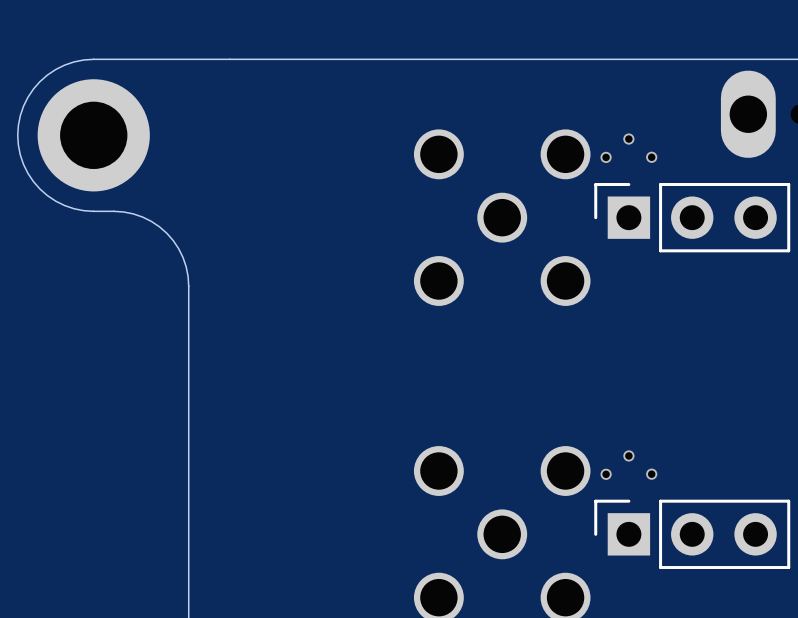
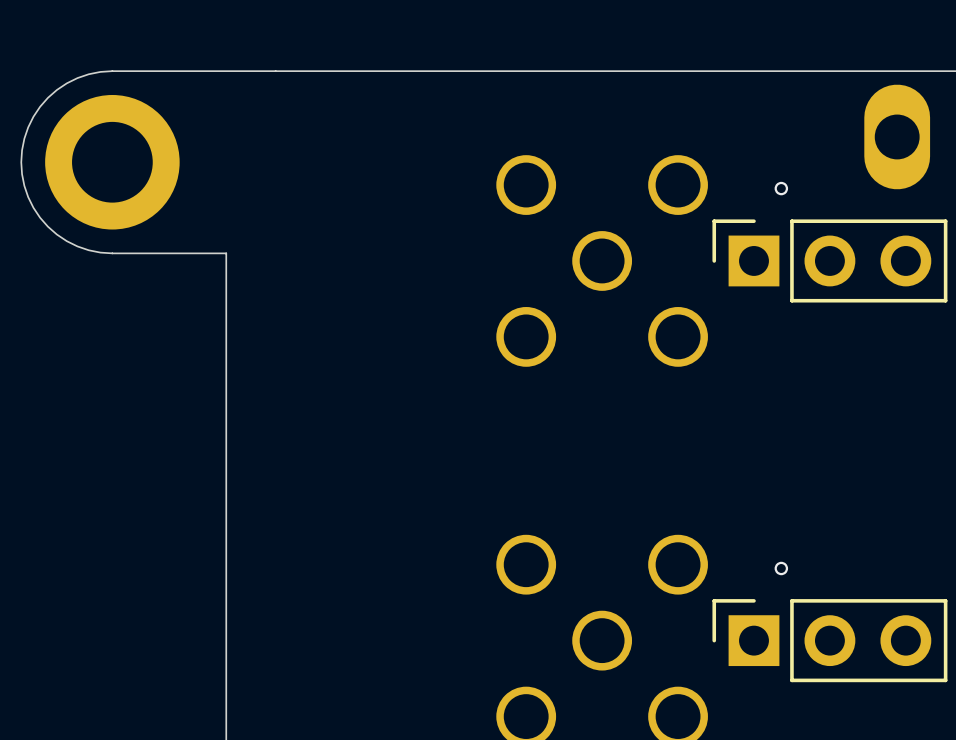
via: (628, 139) -> none
via: (606, 157) -> none
board edge: (113, 211) (142, 217) (166, 233) (183, 257) (188, 286) -> (136, 253) (226, 253) (226, 343)
via: (628, 455) -> none
via: (606, 474) -> none

